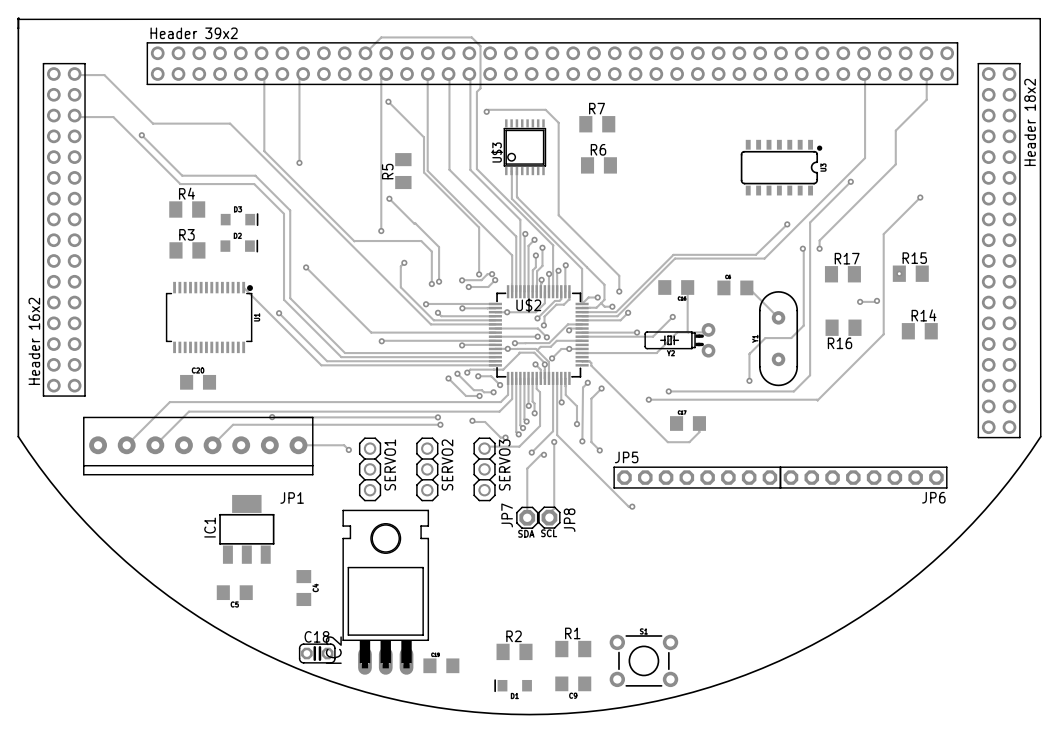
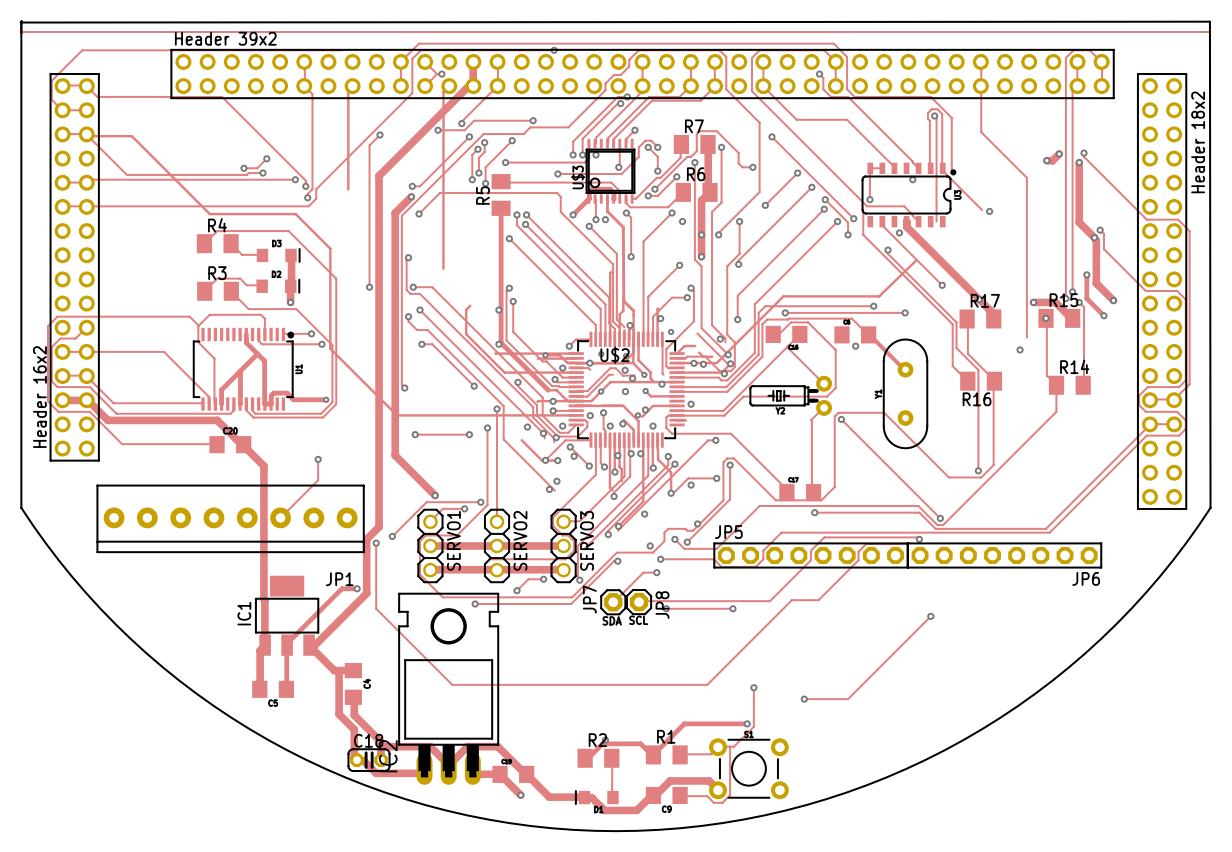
track: none -> (21, 32) (1210, 32)
track: none -> (341, 50) (82, 50) (51, 80) (51, 99) (62, 110) (86, 110)
track: none -> (554, 50) (420, 50) (412, 58) (412, 93) (316, 189) (316, 198) (308, 206) (62, 206)
via: none -> (554, 50)
track: none -> (304, 61) (304, 86) (312, 94) (312, 189) (307, 193) (307, 197)
track: (365, 53) (381, 37) (471, 37) (480, 46) (480, 88) (476, 91) (476, 169) (553, 245) (553, 291) -> (672, 213) (643, 241) (643, 339)
track: none -> (425, 61) (437, 74)
track: none -> (473, 61) (473, 86) (466, 88) (379, 175) (379, 526) (366, 539) (366, 593) (314, 645) (309, 645) (334, 670) (353, 670)
track: none -> (497, 61) (497, 85) (461, 123)
track: none -> (642, 61) (642, 91) (595, 137) (595, 143)
track: none -> (690, 61) (690, 86) (679, 96) (649, 96) (608, 137) (607, 143)
track: none -> (715, 61) (715, 86) (700, 100) (652, 100) (614, 138) (613, 143)
track: none -> (763, 61) (763, 86) (796, 119) (847, 119) (894, 168)
track: none -> (980, 61) (981, 132) (1026, 177) (1026, 337)
track: none -> (1077, 61) (1077, 86) (1072, 91) (1072, 291)
track: none -> (437, 74) (425, 86)
via: none -> (441, 74)
track: none -> (819, 74) (823, 77) (823, 89) (830, 96) (848, 96) (918, 168)
via: none -> (819, 74)
track: none -> (62, 86) (86, 85) (97, 96) (222, 96) (305, 180) (305, 186)
track: (74, 74) (104, 75) (152, 123) (230, 123) (430, 324) (495, 324) -> (513, 301) (513, 331) (542, 361) (546, 361) (562, 377) (576, 377)
track: (261, 74) (264, 76) (264, 151) (354, 241) (421, 241) (431, 251) (431, 284) -> none
track: none -> (400, 86) (400, 61) (419, 43) (833, 43) (847, 56) (847, 89) (854, 96) (930, 96) (951, 117) (951, 170)
track: (427, 74) (427, 170) (512, 255) (512, 291) (511, 284) -> none
track: (448, 74) (449, 169) (516, 236) (516, 291) -> (516, 214) (516, 225) (600, 309) (600, 339)
track: (469, 74) (470, 169) (520, 219) (520, 291) -> (525, 224) (605, 304) (605, 339)
track: none -> (835, 86) (835, 61) (824, 50) (759, 50) (751, 57) (751, 91) (867, 206) (904, 206) (918, 221)
track: (864, 74) (865, 158) (764, 258) (675, 258) (617, 316) (582, 316) -> (691, 288) (693, 291) (693, 321) (666, 349) (666, 366) (668, 368) (677, 367)
track: (926, 74) (926, 99) (895, 130) (895, 164) (819, 240) (819, 248) -> none
track: none -> (1101, 86) (1101, 61) (1089, 50) (1073, 50) (1065, 57) (1065, 298)
track: none -> (627, 96) (617, 96) (573, 141) (573, 154)
via: none -> (627, 96)
track: none -> (620, 103) (617, 103) (582, 138) (582, 154)
via: none -> (620, 103)
track: none -> (934, 115) (936, 117) (936, 221)
via: none -> (934, 115)
track: (388, 101) (424, 137) (424, 172) (479, 227) (479, 274) -> none
via: (388, 101) -> none
track: none -> (533, 120) (474, 120) (464, 130) (438, 130)
via: none -> (533, 120)
via: none -> (461, 123)
via: none -> (438, 130)
track: (486, 111) (488, 109) (545, 109) (558, 122) (558, 215) (619, 275) (619, 291) -> none
via: (486, 111) -> none
track: none -> (634, 130) (626, 138) (625, 143)
via: none -> (634, 130)
track: none -> (62, 134) (86, 134) (126, 174) (246, 174) (248, 173) (262, 173)
track: none -> (380, 134) (369, 145) (369, 287)
via: none -> (380, 134)
track: none -> (469, 136) (419, 186) (412, 186)
via: none -> (469, 136)
track: none -> (771, 136) (853, 218)
via: none -> (771, 136)
track: none -> (512, 140) (485, 167) (485, 183)
via: none -> (512, 140)
track: none -> (484, 142) (484, 152) (478, 157) (478, 173)
via: none -> (484, 142)
track: none -> (588, 143) (589, 157) (584, 162) (505, 162)
track: none -> (619, 143) (618, 167)
track: none -> (681, 144) (680, 157) (660, 177) (656, 177) (635, 198) (632, 199)
track: none -> (708, 144) (708, 189) (710, 192) (701, 200) (701, 256)
track: none -> (648, 147) (657, 156) (657, 171)
via: none -> (648, 147)
track: none -> (657, 147) (651, 140) (645, 140) (638, 147) (638, 156) (621, 174) (557, 174)
via: none -> (657, 147)
track: none -> (721, 147) (721, 202) (712, 212) (712, 325) (725, 338) (725, 342)
via: none -> (721, 147)
track: none -> (477, 149) (472, 154) (472, 179)
via: none -> (477, 149)
track: none -> (1083, 153) (1083, 156) (1146, 219) (1178, 219) (1189, 231) (1189, 384) (1174, 400) (1150, 400)
via: none -> (1083, 153)
track: none -> (1059, 154) (1052, 160) (1046, 160)
via: none -> (1059, 154)
via: none -> (573, 154)
via: none -> (582, 154)
via: none -> (595, 154)
track: (141, 135) (182, 175) (255, 175) (290, 210) (290, 298) (345, 353) (495, 353) -> (553, 410) (576, 410)
via: (141, 135) -> none
track: none -> (266, 158) (257, 168) (243, 168)
via: none -> (266, 158)
via: none -> (1046, 160)
via: none -> (505, 162)
track: none -> (694, 162) (694, 259) (701, 266) (701, 328) (728, 354)
via: none -> (694, 162)
track: none -> (1079, 162) (1079, 222) (1096, 240) (1096, 283) (1113, 300)
via: none -> (1079, 162)
via: none -> (618, 167)
track: none -> (752, 167) (742, 167) (738, 163) (738, 153) (716, 131) (699, 131) (696, 134) (696, 151) (691, 156) (687, 156) (654, 189)
via: none -> (752, 167)
via: none -> (243, 168)
track: none -> (882, 168) (870, 168) (869, 199)
track: none -> (930, 168) (929, 120) (927, 113) (931, 109) (937, 109) (942, 114) (943, 171) (982, 210)
via: none -> (657, 171)
via: none -> (262, 173)
via: none -> (478, 173)
track: none -> (797, 173) (765, 205)
via: none -> (797, 173)
via: none -> (557, 174)
track: none -> (676, 176) (657, 195) (648, 195)
via: none -> (676, 176)
track: none -> (295, 179) (89, 179) (86, 182) (62, 182)
via: none -> (295, 179)
via: none -> (472, 179)
via: none -> (912, 179)
track: none -> (501, 181) (611, 182) (619, 191) (619, 199)
via: none -> (485, 183)
via: none -> (305, 186)
via: none -> (412, 186)
track: none -> (811, 187) (738, 260) (738, 264)
via: none -> (811, 187)
via: (299, 162) -> none
via: none -> (654, 189)
track: none -> (683, 192) (668, 207) (630, 207) (626, 203) (625, 199)
via: none -> (648, 195)
track: none -> (411, 196) (395, 213) (395, 455) (435, 495)
via: none -> (411, 196)
via: none -> (307, 197)
R5 position: (403, 171) -> (501, 194)
track: (511, 171) (511, 198) (582, 268) (582, 303) -> (595, 199) (595, 219)
track: (516, 171) (517, 197) (604, 284) (604, 299) (596, 307) (582, 308) -> (739, 221) (739, 253) (727, 266) (727, 334) (734, 342) (734, 367) (731, 370) (719, 370) (705, 356) (677, 358)
track: none -> (607, 199) (607, 211) (623, 227) (623, 301) (633, 310) (633, 363) (567, 362) (559, 355) (545, 355)
track: none -> (613, 199) (614, 193) (610, 189) (592, 189) (589, 192) (589, 198) (573, 214)
track: none -> (825, 199) (848, 222) (848, 234)
via: none -> (825, 199)
via: none -> (869, 199)
via: none -> (765, 205)
track: none -> (501, 208) (501, 343)
track: none -> (824, 209) (737, 295) (737, 319)
via: none -> (824, 209)
track: (850, 181) (810, 222) (810, 375) (793, 391) (668, 391) -> none
track: none -> (863, 212) (863, 234) (952, 324) (952, 366) (967, 381)
track: none -> (419, 213) (439, 193) (556, 193) (560, 196) (560, 212) (613, 264) (613, 321) (619, 328)
via: none -> (419, 213)
track: none -> (626, 213) (631, 217) (631, 256)
via: none -> (626, 213)
via: none -> (672, 213)
via: none -> (516, 214)
via: none -> (526, 214)
via: none -> (573, 214)
via: none -> (595, 219)
via: none -> (605, 219)
via: none -> (853, 218)
via: none -> (682, 221)
via: none -> (739, 221)
via: none -> (837, 221)
track: none -> (882, 221) (883, 226) (942, 285)
track: none -> (906, 221) (907, 227) (993, 313) (993, 318)
via: none -> (525, 224)
track: none -> (589, 226) (616, 253) (616, 319) (624, 327)
via: none -> (589, 226)
track: (920, 197) (883, 234) (883, 334) (817, 400) -> none
via: (920, 197) -> none
track: none -> (1100, 230) (1103, 233) (1103, 249) (1145, 291) (1177, 291) (1185, 299) (1185, 380) (1179, 387) (1147, 387) (1139, 395) (1139, 405) (1145, 411) (1177, 411) (1185, 420) (1185, 428) (1179, 435) (1146, 435) (1049, 532) (781, 532) (763, 550) (763, 559) (755, 566) (721, 566) (713, 559) (660, 559)
via: none -> (1100, 230)
track: (389, 198) (439, 247) (439, 281) -> none
via: (389, 198) -> none
via: none -> (899, 232)
via: none -> (701, 234)
track: none -> (718, 234) (759, 192) (759, 122) (726, 89) (726, 56) (719, 50) (638, 50) (629, 59) (629, 66) (620, 75) (614, 75) (605, 83) (605, 90) (568, 127) (530, 127) (523, 134) (483, 134) (401, 215) (401, 385) (404, 388)
via: none -> (718, 234)
via: none -> (848, 234)
via: none -> (1094, 237)
track: none -> (509, 238) (595, 325) (595, 339)
via: none -> (509, 238)
track: none -> (204, 243) (217, 231) (288, 231) (336, 278) (336, 404) (322, 417) (253, 417) (246, 410) (246, 404)
track: none -> (231, 243) (242, 254) (262, 255)
track: none -> (888, 250) (888, 253) (956, 322) (956, 348) (978, 369) (978, 470)
via: none -> (888, 250)
track: none -> (291, 255) (290, 302)
via: none -> (631, 256)
via: none -> (701, 256)
track: none -> (408, 257) (406, 259) (406, 290) (410, 293) (419, 293) (533, 407) (533, 417) (554, 438) (554, 442)
via: none -> (408, 257)
via: (787, 224) -> none
via: none -> (738, 264)
via: none -> (679, 265)
via: (381, 231) -> none
via: (525, 234) -> none
track: none -> (1086, 274) (1086, 298) (1103, 315)
via: none -> (1086, 274)
track: (534, 239) (528, 245) (528, 291) -> (526, 214) (609, 297) (609, 323) (614, 329) (614, 339)
via: (534, 239) -> none
via: none -> (942, 285)
track: none -> (262, 286) (246, 285) (240, 278) (217, 278) (204, 291)
via: none -> (369, 287)
via: none -> (413, 287)
via: none -> (509, 288)
track: (542, 247) (542, 265) (537, 271) (536, 284) -> none
via: (542, 247) -> none
via: none -> (691, 288)
track: (802, 248) (803, 325) (791, 338) (765, 338) (749, 354) (749, 380) -> none
via: (802, 248) -> none
via: (819, 248) -> none
track: none -> (231, 291) (248, 309) (296, 309) (332, 345) (332, 402) (321, 413) (255, 413) (252, 410) (252, 404)
via: none -> (1072, 291)
via: (535, 255) -> none
via: none -> (687, 297)
via: none -> (1065, 298)
via: none -> (979, 299)
via: none -> (1113, 300)
via: none -> (513, 301)
via: none -> (290, 302)
track: none -> (1033, 302) (1055, 302) (1072, 318)
via: none -> (1033, 302)
track: none -> (1079, 302) (1083, 307) (1083, 385)
via: none -> (1079, 302)
via: (404, 262) -> none
via: none -> (873, 306)
via: (565, 265) -> none
track: none -> (419, 310) (544, 434) (544, 438)
via: none -> (419, 310)
via: none -> (498, 310)
track: (306, 267) (371, 332) (495, 332) -> (509, 288) (506, 291) (506, 340) (552, 386) (576, 386)
via: (306, 267) -> none
track: none -> (785, 312) (905, 312)
via: none -> (785, 312)
via: none -> (905, 312)
track: (558, 270) (557, 291) -> (679, 265) (648, 296) (648, 339)
via: (558, 270) -> none
via: none -> (1103, 315)
track: none -> (408, 316) (408, 321) (417, 330) (427, 330) (503, 406) (503, 439) (555, 490)
via: none -> (408, 316)
via: (549, 273) -> none
via: none -> (660, 318)
track: none -> (1046, 318) (1046, 375) (1056, 385)
via: (479, 274) -> none
track: (492, 274) (487, 274) (481, 280) (462, 280) -> none
via: (492, 274) -> none
track: (548, 274) (548, 291) -> (654, 382) (650, 378) (650, 372) (638, 360) (638, 339)
via: none -> (737, 319)
track: none -> (967, 318) (967, 353) (994, 380) (993, 465) (981, 477) (948, 477) (884, 412) (838, 412) (834, 416) (834, 486) (821, 500) (775, 500) (733, 458) (727, 458) (723, 462) (723, 500) (692, 530) (668, 528) (664, 532) (664, 541) (653, 552) (616, 552) (572, 597) (442, 597) (419, 574) (419, 541) (425, 535) (457, 535) (487, 505) (487, 428)
track: none -> (198, 325) (189, 316) (57, 316) (47, 326) (47, 401) (58, 411) (89, 411) (122, 444) (217, 444)
via: (462, 280) -> none
track: (495, 280) (488, 287) (468, 287) -> none
via: (495, 280) -> none
track: none -> (86, 327) (75, 338) (60, 338) (51, 347) (51, 381) (57, 387) (89, 387) (116, 413) (230, 413) (233, 410) (233, 404)
via: (439, 281) -> none
via: (431, 284) -> none
via: none -> (671, 331)
track: none -> (697, 333) (728, 364)
track: none -> (246, 334) (246, 342) (264, 361) (264, 404) (271, 403) (271, 395) (273, 393) (286, 393) (293, 399) (326, 399)
track: none -> (258, 334) (259, 341) (262, 344) (321, 344)
track: none -> (264, 334) (264, 318) (261, 314) (209, 314) (198, 326) (198, 342) (214, 358) (215, 404)
track: (243, 287) (321, 365) (495, 365) -> (413, 287) (432, 287) (542, 397) (542, 415) (559, 432) (568, 432) (576, 424)
track: none -> (311, 333) (283, 334)
via: none -> (311, 333)
via: (468, 287) -> none
track: none -> (773, 334) (779, 333) (790, 322) (808, 322) (835, 350) (835, 388) (827, 396) (743, 396) (724, 415) (668, 415) (666, 417) (666, 428) (672, 433) (731, 433) (785, 488)
track: (687, 287) (688, 332) -> none
track: none -> (590, 339) (575, 339) (569, 346)
track: (561, 291) (561, 299) (554, 300) (537, 318) -> (652, 339) (653, 316) (672, 297) (687, 297)
track: (569, 291) (569, 299) (563, 304) (556, 304) (544, 316) (543, 325) -> (662, 339) (663, 374)
track: none -> (501, 343) (548, 390) (556, 390) (567, 400) (591, 401) (610, 382)
via: none -> (321, 344)
track: none -> (421, 344) (432, 344) (474, 386)
via: none -> (421, 344)
via: none -> (498, 344)
via: none -> (569, 346)
via: (597, 297) -> none
via: none -> (855, 346)
track: none -> (787, 347) (824, 383)
track: (877, 300) (860, 301) -> none
via: (860, 301) -> none
track: none -> (62, 351) (164, 351) (208, 396) (209, 404)
track: none -> (257, 353) (221, 389) (221, 404)
via: (426, 304) -> none
via: none -> (601, 354)
via: none -> (545, 355)
via: none -> (728, 354)
via: none -> (626, 356)
via: (612, 306) -> none
via: (462, 308) -> none
via: (437, 312) -> none
track: (438, 312) (441, 316) (495, 316) -> (590, 369) (588, 368) (576, 367)
track: none -> (633, 363) (644, 374)
via: none -> (693, 363)
track: (279, 313) (327, 361) (495, 361) -> (517, 382) (517, 386) (536, 405) (536, 415) (557, 436) (577, 436) (587, 427) (587, 422) (585, 420) (576, 420)
via: (279, 313) -> none
via: none -> (703, 364)
via: none -> (562, 368)
track: (672, 316) (653, 336) (582, 336) -> (905, 369) (902, 369) (851, 318) (767, 319) (762, 324) (762, 356) (727, 391) (677, 391)
via: (672, 316) -> none
track: none -> (240, 371) (240, 404)
via: none -> (724, 373)
via: none -> (644, 374)
track: none -> (62, 376) (86, 376) (113, 403) (203, 404)
track: (582, 324) (567, 324) (549, 343) (525, 343) -> (677, 377) (718, 377) (721, 380) (727, 380) (754, 352) (754, 304) (837, 221)
via: none -> (555, 379)
via: none -> (517, 382)
track: (495, 328) (524, 328) -> (576, 382) (557, 382) (555, 379)
track: (538, 328) (546, 337) -> (625, 382) (664, 382)
track: (708, 329) (706, 332) (677, 332) (656, 353) (582, 353) -> (799, 334) (723, 410) (677, 410)
via: none -> (474, 386)
track: none -> (1056, 385) (1056, 411) (943, 525) (937, 525) (918, 506) (759, 506) (716, 548) (684, 548) (674, 539)
track: (582, 332) (636, 332) -> (677, 386) (726, 387) (758, 354) (758, 312) (765, 306) (873, 306)
via: (637, 332) -> none
via: none -> (404, 388)
track: (495, 336) (537, 336) -> (576, 391) (587, 391) (610, 368) (615, 368) (623, 375) (634, 375)
via: none -> (601, 391)
via: none -> (645, 391)
via: (546, 337) -> none
track: (495, 340) (381, 341) -> (576, 396) (587, 396) (609, 374) (613, 374)
track: (559, 340) (556, 340) (550, 346) (540, 346) (537, 350) -> (650, 396) (645, 391)
via: (381, 341) -> none
via: none -> (326, 399)
track: (514, 343) (525, 343) -> none
via: (514, 343) -> none
track: none -> (62, 400) (86, 399) (107, 420) (217, 420) (263, 466) (265, 645) (260, 650) (259, 689)
via: (462, 345) -> none
via: none -> (553, 401)
via: none -> (691, 404)
via: (507, 348) -> none
via: (569, 348) -> none
track: none -> (824, 407) (810, 420)
track: none -> (497, 408) (497, 521)
via: none -> (497, 408)
via: none -> (645, 409)
via: none -> (553, 410)
via: none -> (603, 412)
via: none -> (590, 415)
via: none -> (638, 415)
via: (552, 358) -> none
track: none -> (841, 419) (940, 518)
via: none -> (841, 419)
track: (589, 361) (591, 365) (667, 442) (689, 442) (699, 432) (699, 423) -> none
track: none -> (811, 419) (811, 488)
track: (535, 364) (540, 369) (540, 378) -> (614, 496) (614, 492) (630, 476) (631, 453) (629, 451) (629, 440)
via: (544, 364) -> none
track: none -> (1174, 424) (1150, 424) (1045, 528) (935, 528) (919, 512) (814, 512)
via: none -> (562, 426)
via: none -> (610, 426)
via: none -> (653, 426)
via: none -> (487, 428)
via: none -> (527, 427)
track: (467, 372) (470, 369) (503, 369) (519, 352) (534, 352) (544, 363) (544, 378) -> (623, 419) (633, 430) (633, 440)
track: none -> (415, 434) (469, 434)
via: none -> (415, 434)
via: none -> (469, 434)
track: (457, 373) (473, 390) (493, 392) -> none
via: (457, 373) -> none
track: (478, 376) (491, 376) (500, 385) -> none
via: (448, 378) -> none
track: (508, 378) (508, 394) (500, 402) (169, 402) (126, 445) -> (590, 440) (565, 440) (545, 460)
track: (512, 378) (512, 399) (499, 411) (188, 411) (155, 445) -> (595, 440) (595, 474) (553, 517) (553, 525) (562, 535) (568, 535) (574, 541) (574, 550) (565, 559) (489, 559)
track: (516, 378) (516, 431) (518, 434) -> (600, 440) (600, 463) (604, 467)
track: (520, 378) (520, 425) (523, 428) -> (605, 440) (603, 412)
track: (536, 378) (536, 388) (540, 392) (540, 425) (519, 446) (486, 446) (484, 448) -> (624, 440) (624, 476) (579, 521) (563, 521)
track: (557, 378) (557, 435) (628, 506) (632, 506) -> (648, 440) (648, 475) (577, 545) (577, 578) (579, 580)
track: none -> (715, 440) (708, 440) (617, 530)
via: none -> (715, 440)
via: (749, 380) -> none
track: (587, 382) (583, 387) (582, 441) -> none
via: (587, 382) -> none
track: none -> (570, 447) (589, 466)
via: none -> (570, 447)
via: (500, 385) -> none
track: (601, 388) (591, 398) (591, 442) (599, 450) -> none
via: (601, 388) -> none
via: none -> (631, 453)
via: none -> (640, 453)
via: none -> (617, 455)
via: (668, 391) -> none
track: none -> (668, 456) (668, 465) (584, 548)
via: none -> (668, 456)
track: none -> (318, 459) (318, 480) (280, 517)
via: none -> (545, 460)
track: none -> (674, 464) (608, 530) (608, 534)
via: none -> (674, 464)
track: none -> (730, 465) (730, 499) (687, 542)
via: none -> (730, 465)
track: (648, 399) (817, 400) -> none
via: (648, 399) -> none
via: none -> (589, 466)
via: none -> (604, 467)
via: none -> (978, 470)
track: none -> (716, 478) (688, 478) (673, 493) (669, 493)
via: none -> (716, 478)
via: none -> (556, 481)
via: (534, 413) -> none
track: (272, 417) (437, 417) -> none
via position: (272, 417) -> (318, 459)
via: (437, 417) -> none
via: none -> (691, 485)
track: (472, 420) (485, 421) (500, 437) (505, 437) -> none
via: (526, 421) -> none
track: (440, 424) (233, 424) (212, 445) -> none
via: (440, 424) -> none
via: none -> (435, 495)
via: none -> (614, 496)
via: (523, 428) -> none
track: none -> (480, 502) (426, 502) (392, 536)
via: none -> (480, 502)
via: (518, 434) -> none
track: none -> (464, 508) (442, 508) (430, 521)
via: none -> (464, 508)
via: (505, 437) -> none
via: none -> (814, 512)
via: (582, 441) -> none
track: (554, 442) (554, 508) (549, 513) (549, 517) -> (919, 539) (917, 537) (824, 537) (810, 550) (810, 560) (770, 601) (639, 602)
track: (298, 445) (344, 445) (348, 449) -> none
via: none -> (940, 518)
via: (348, 449) -> none
track: (543, 454) (541, 454) (527, 468) (527, 517) -> (656, 572) (643, 572) (613, 602)
via: (543, 454) -> none
via: none -> (608, 534)
via: none -> (392, 536)
via: none -> (674, 539)
via: none -> (919, 539)
track: none -> (376, 543) (376, 608) (452, 684) (707, 684) (791, 600) (818, 600) (858, 560) (858, 551) (866, 544) (905, 544)
via: none -> (376, 543)
via: none -> (687, 542)
track: none -> (430, 545) (563, 545)
via: none -> (650, 545)
via: none -> (660, 559)
track: none -> (617, 561) (614, 561) (571, 604) (475, 604)
via: none -> (617, 561)
track: none -> (430, 570) (563, 570)
via: none -> (656, 572)
track: none -> (543, 579) (528, 579) (516, 590)
via: none -> (543, 579)
via: none -> (579, 580)
track: none -> (357, 588) (341, 588) (287, 643) (286, 689)
via: none -> (357, 588)
via position: (632, 506) -> (732, 608)
via: none -> (516, 590)
via: none -> (475, 604)
track: none -> (666, 608) (732, 608)
via: none -> (666, 608)
track: none -> (930, 616) (848, 699) (804, 699)
via: none -> (930, 616)
track: none -> (339, 670) (339, 714) (354, 729) (354, 757) (357, 760) (363, 760) (376, 773) (419, 773) (424, 768)
track: none -> (753, 687) (753, 726) (733, 746) (718, 746) (711, 754) (680, 754)
via: none -> (753, 687)
track: none -> (353, 697) (354, 715) (380, 741) (380, 760)
via: none -> (804, 699)
track: none -> (747, 723) (684, 723) (653, 754) (640, 743) (602, 743) (588, 758) (585, 758)
via: none -> (747, 723)
via: none -> (605, 740)
track: none -> (380, 746) (430, 746) (448, 764) (448, 768) (451, 762) (467, 746) (497, 746) (549, 797) (592, 798) (604, 810) (636, 810) (670, 780) (709, 780) (718, 790)
track: none -> (730, 746) (730, 795) (722, 802) (713, 802) (707, 796) (680, 795)
track: none -> (611, 758) (613, 797)
track: none -> (472, 768) (477, 774) (500, 774) (520, 795)
via: none -> (520, 795)

